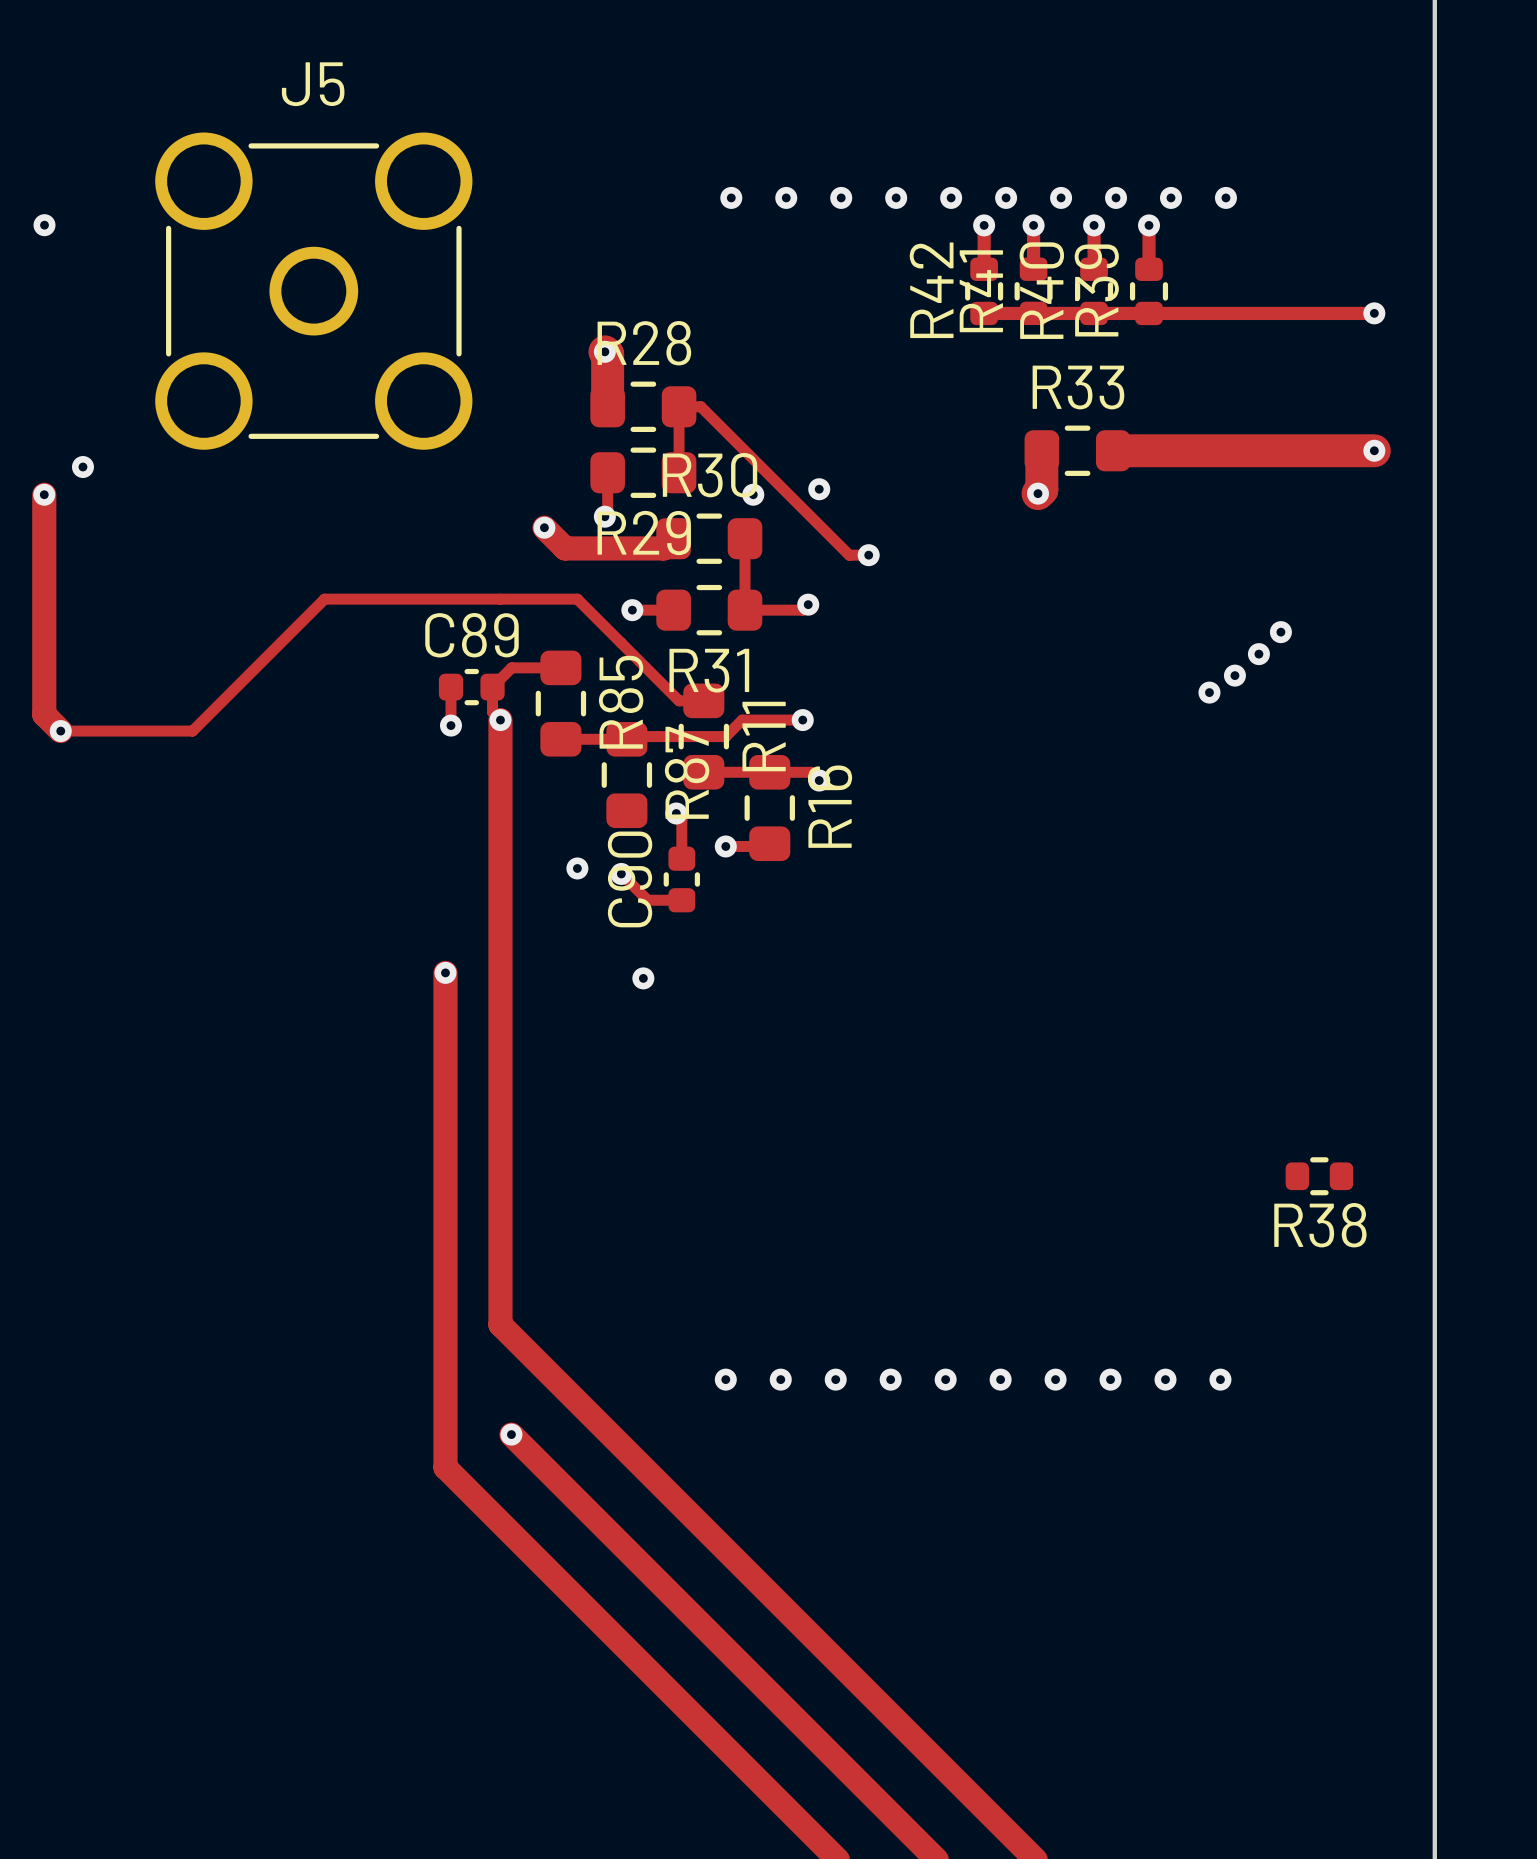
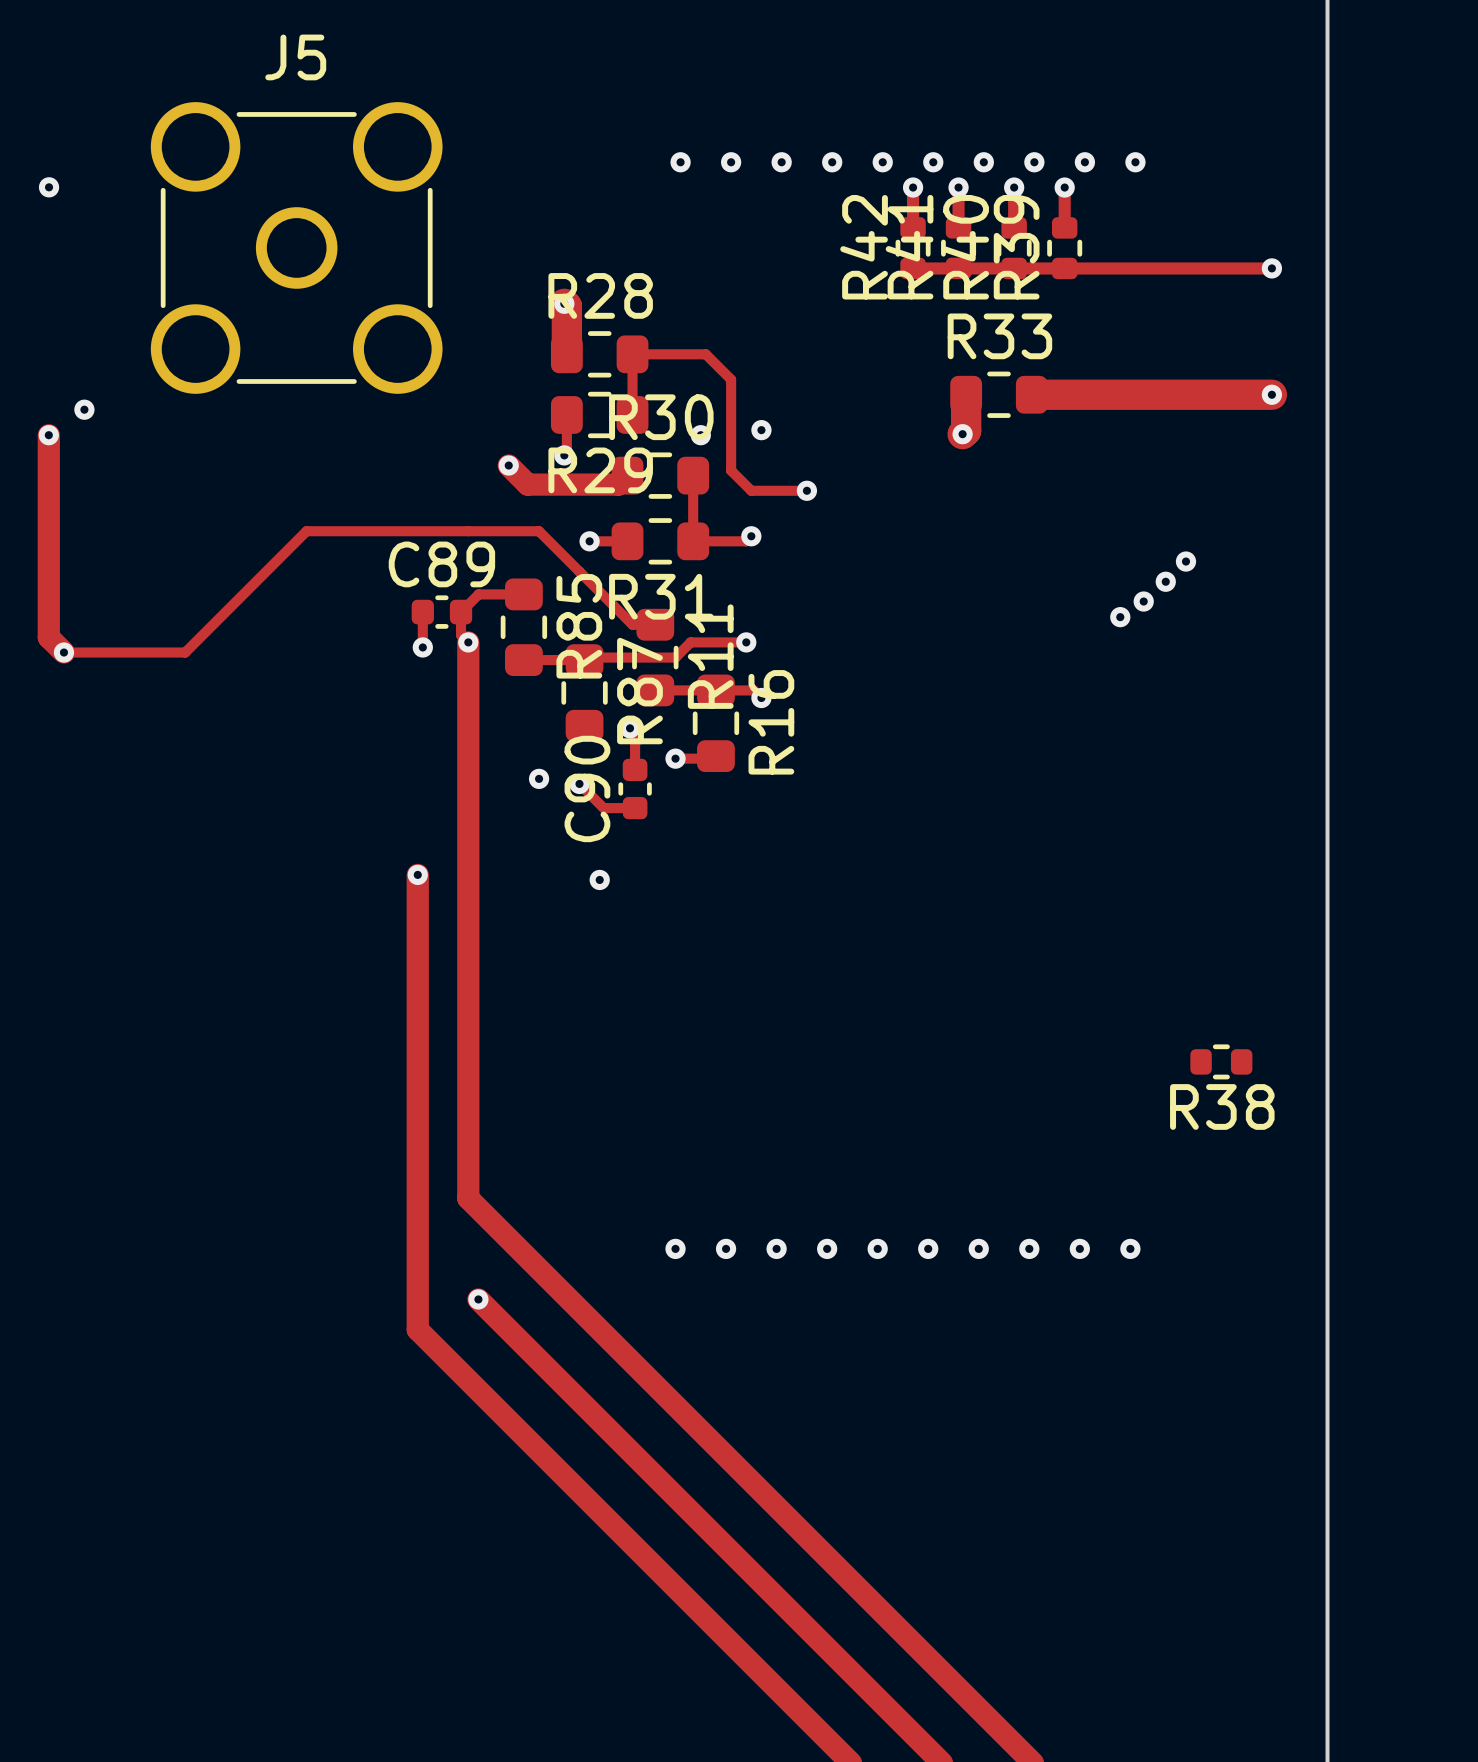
track: (700, 406) (849, 555) -> (652, 354) (705, 354) (731, 379) (731, 470) (751, 490) (789, 490)

